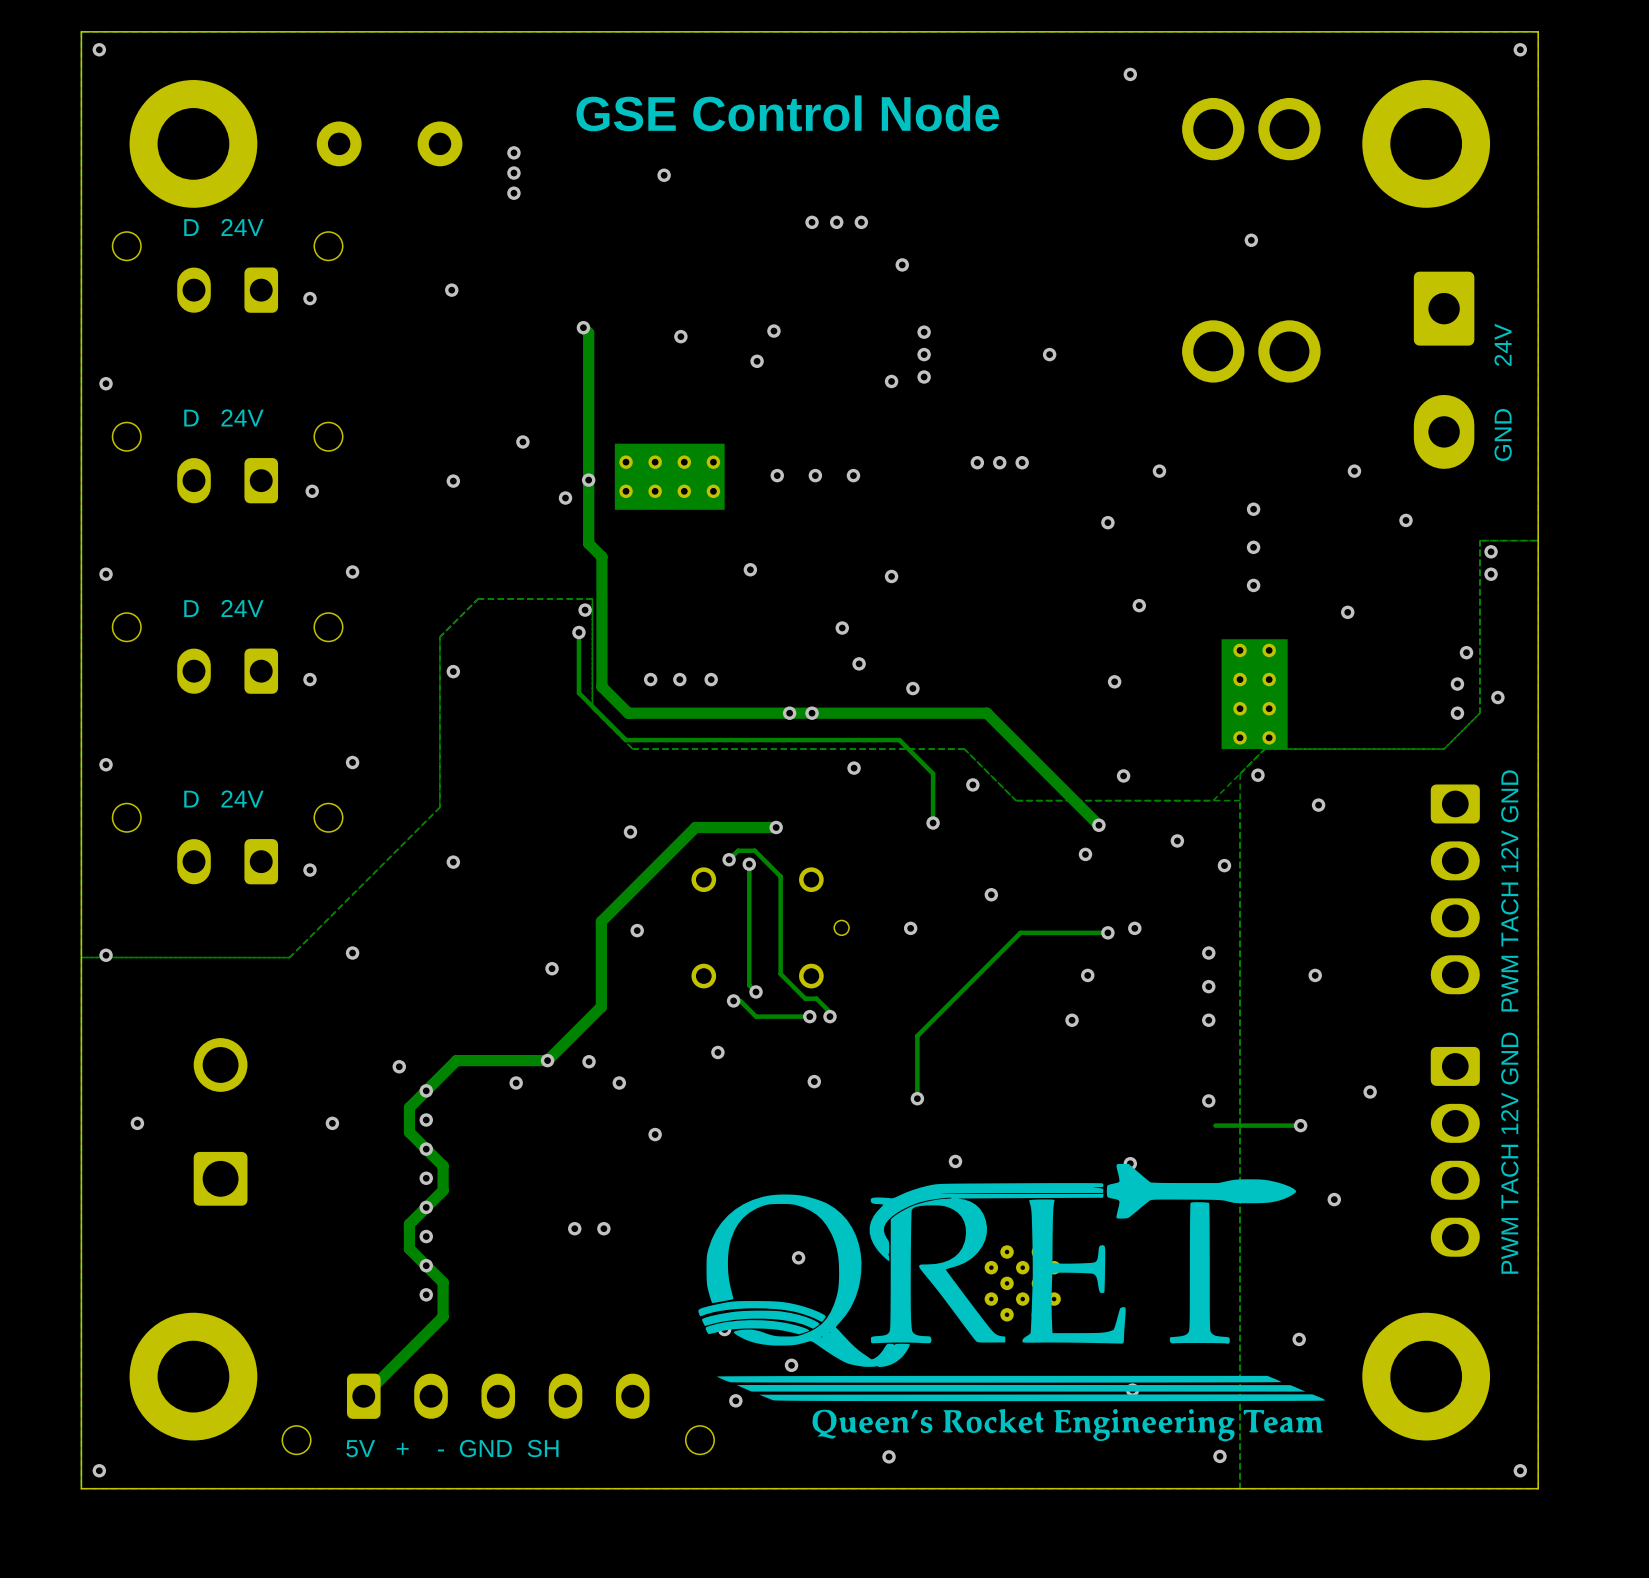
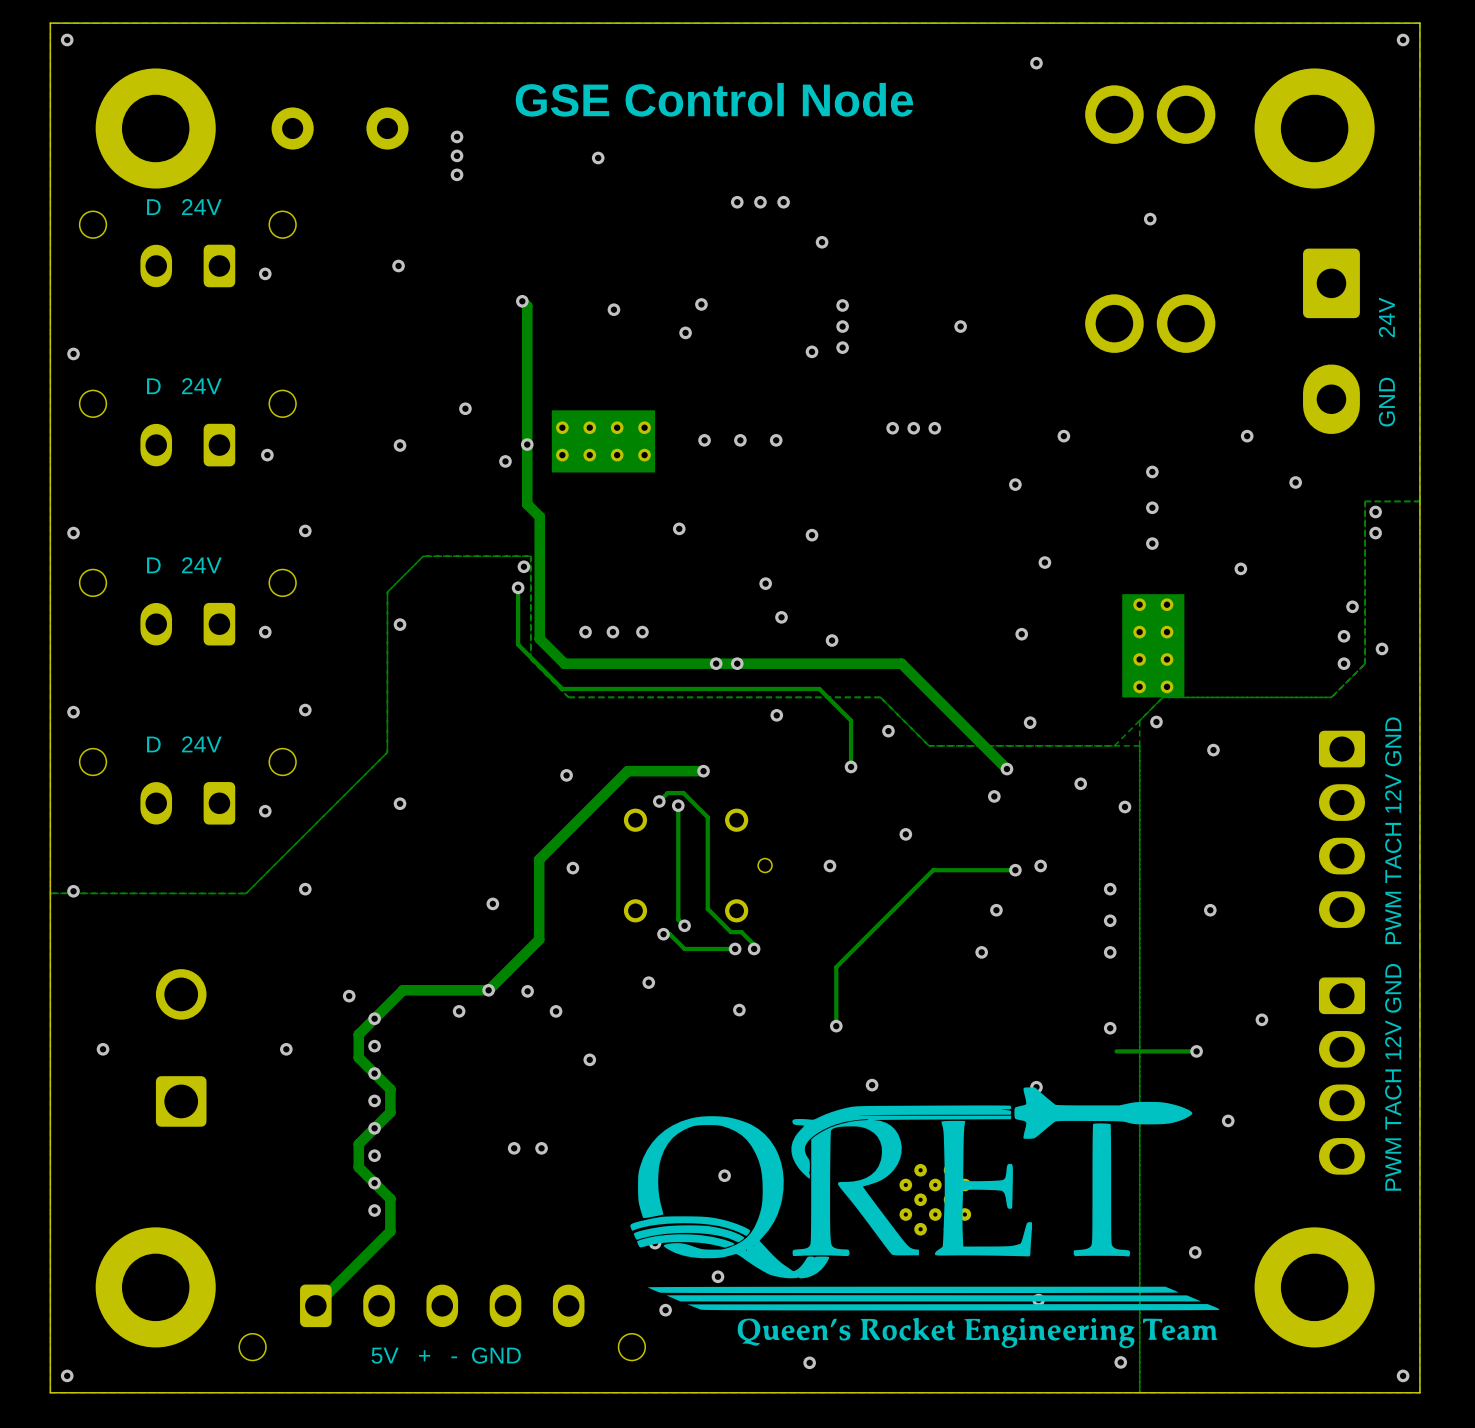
text: 5V + - GND SH (452, 1448) -> 5V + - GND (446, 1355)

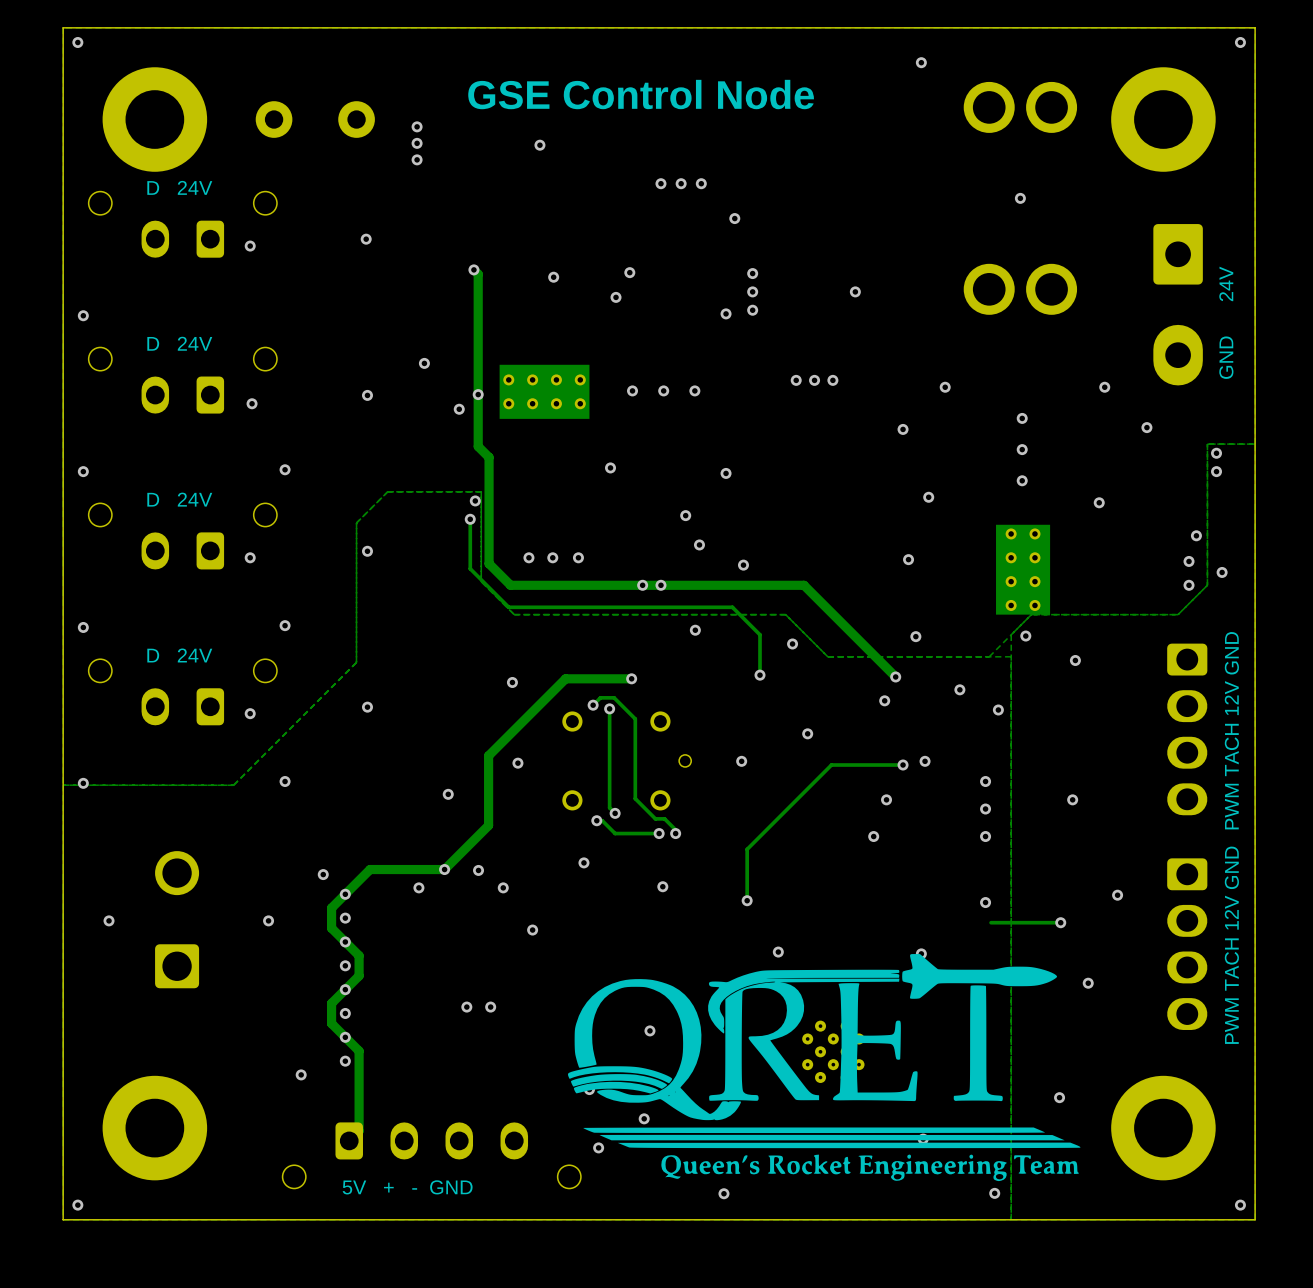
via: none -> (301, 1074)
track: (390, 1231) (315, 1305) -> (359, 1079) (359, 1131) (349, 1140)
part: none -> (431, 1155)
part: (442, 1322) -> none

